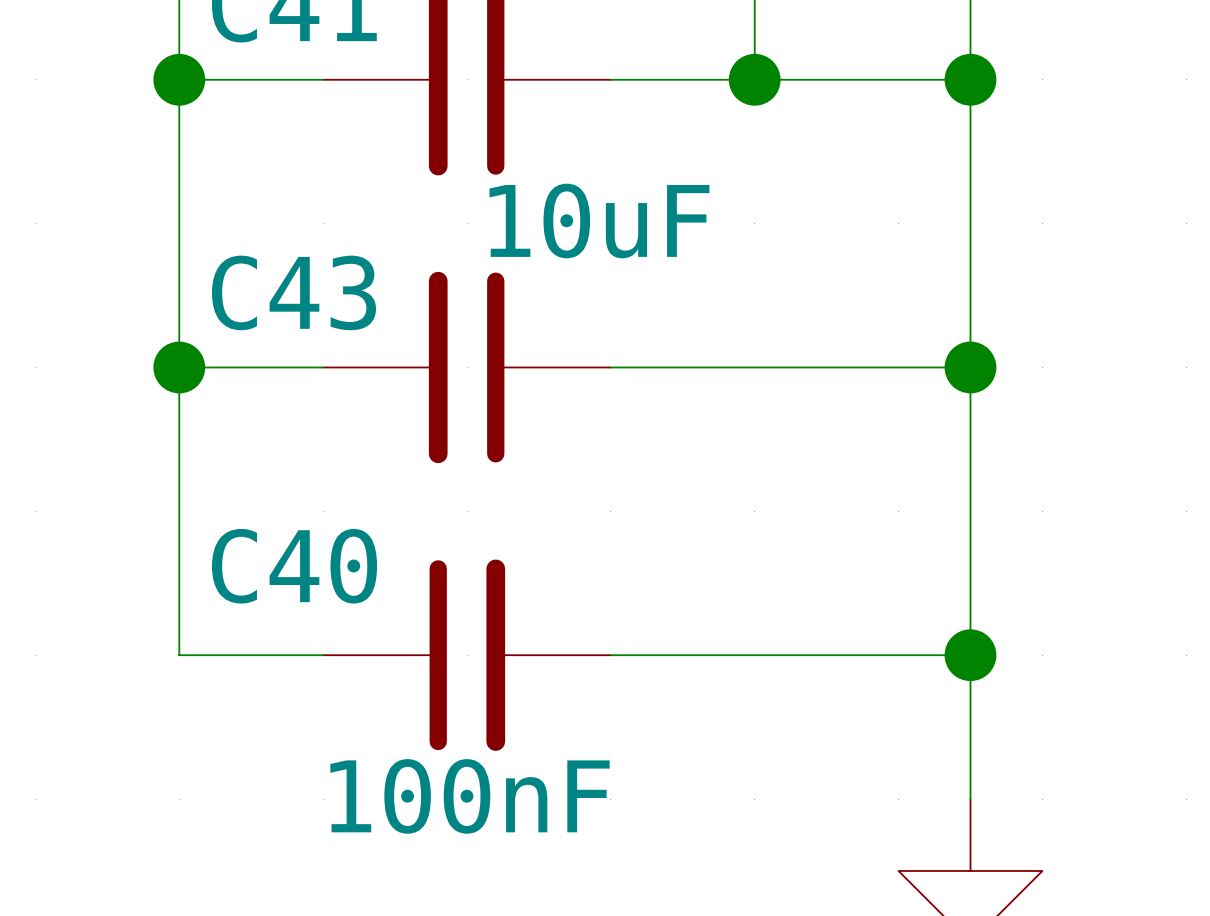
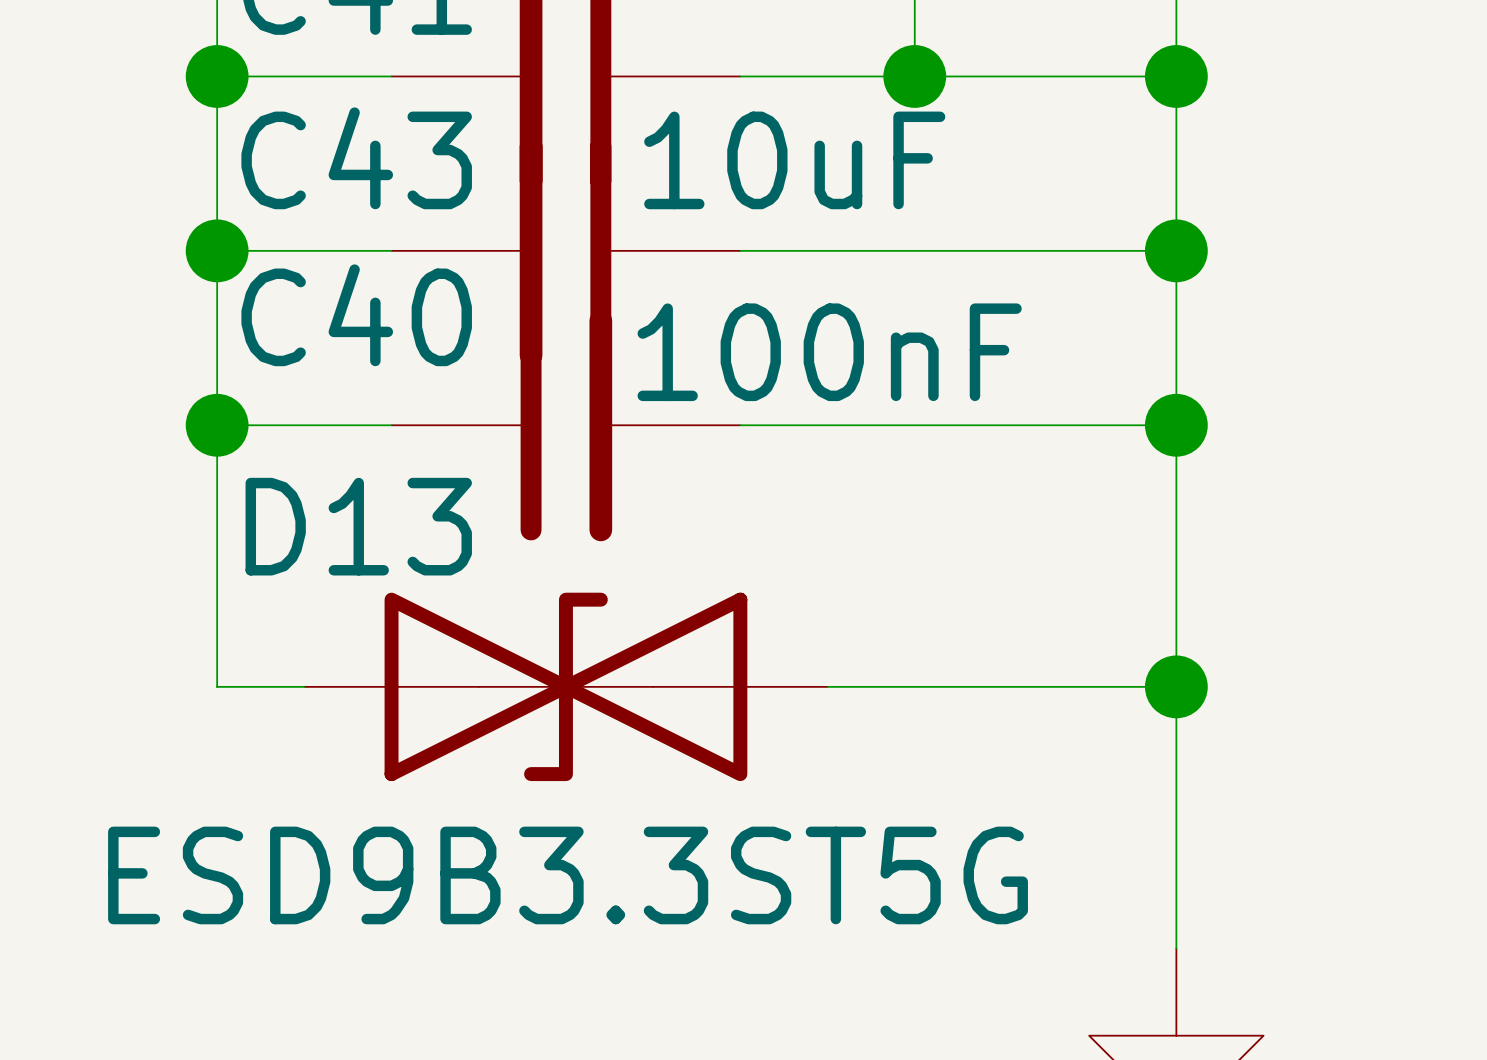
C43 value position: 10uF (599, 220) -> 10uF (794, 160)
wire: none -> (217, 250) (391, 250)
junction: none -> (217, 250)
junction: none -> (1176, 250)
C43 position: (467, 367) -> (565, 250)
wire: (179, 583) (179, 655) (323, 655) -> (217, 686) (304, 686)
D13: none -> ESD9B3.3ST5G (565, 686)
wire: none -> (827, 686) (1176, 686)
C40 position: (467, 655) -> (565, 425)
wire: (610, 655) (970, 655) -> (740, 250) (1176, 250)
junction position: (970, 655) -> (1176, 686)
C40 value position: 100nF (470, 796) -> 100nF (829, 352)

